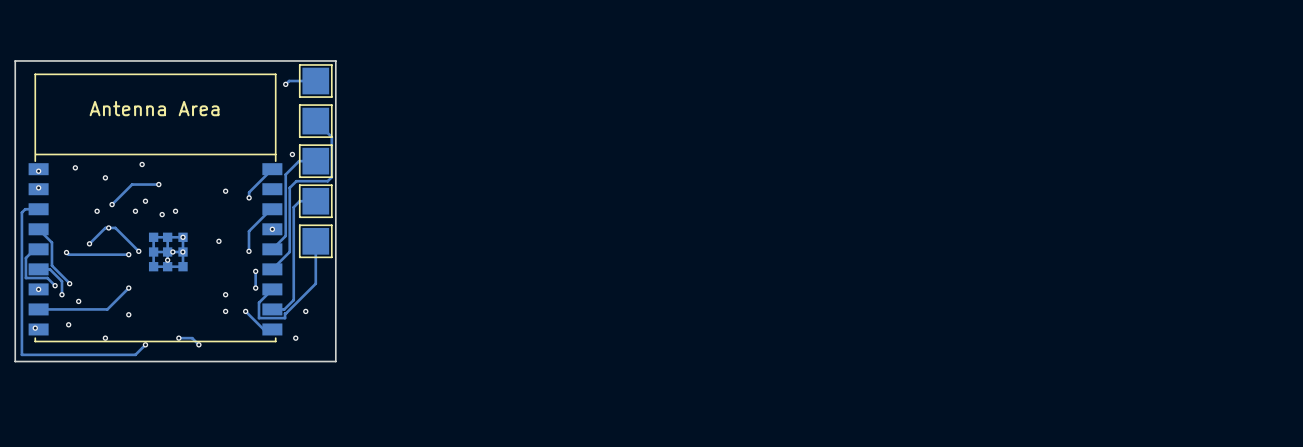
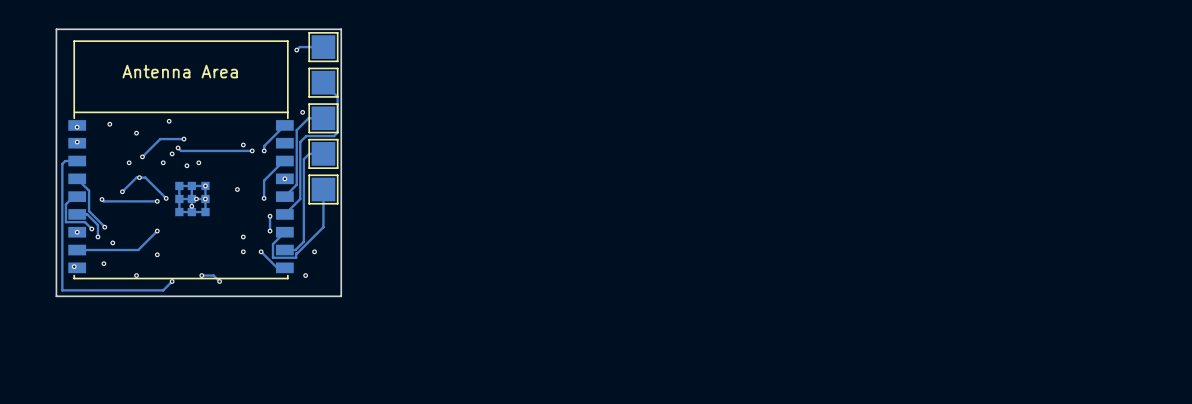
track: none -> (178, 147) (181, 150) (252, 150)
via: none -> (178, 147)
via: none -> (252, 150)

